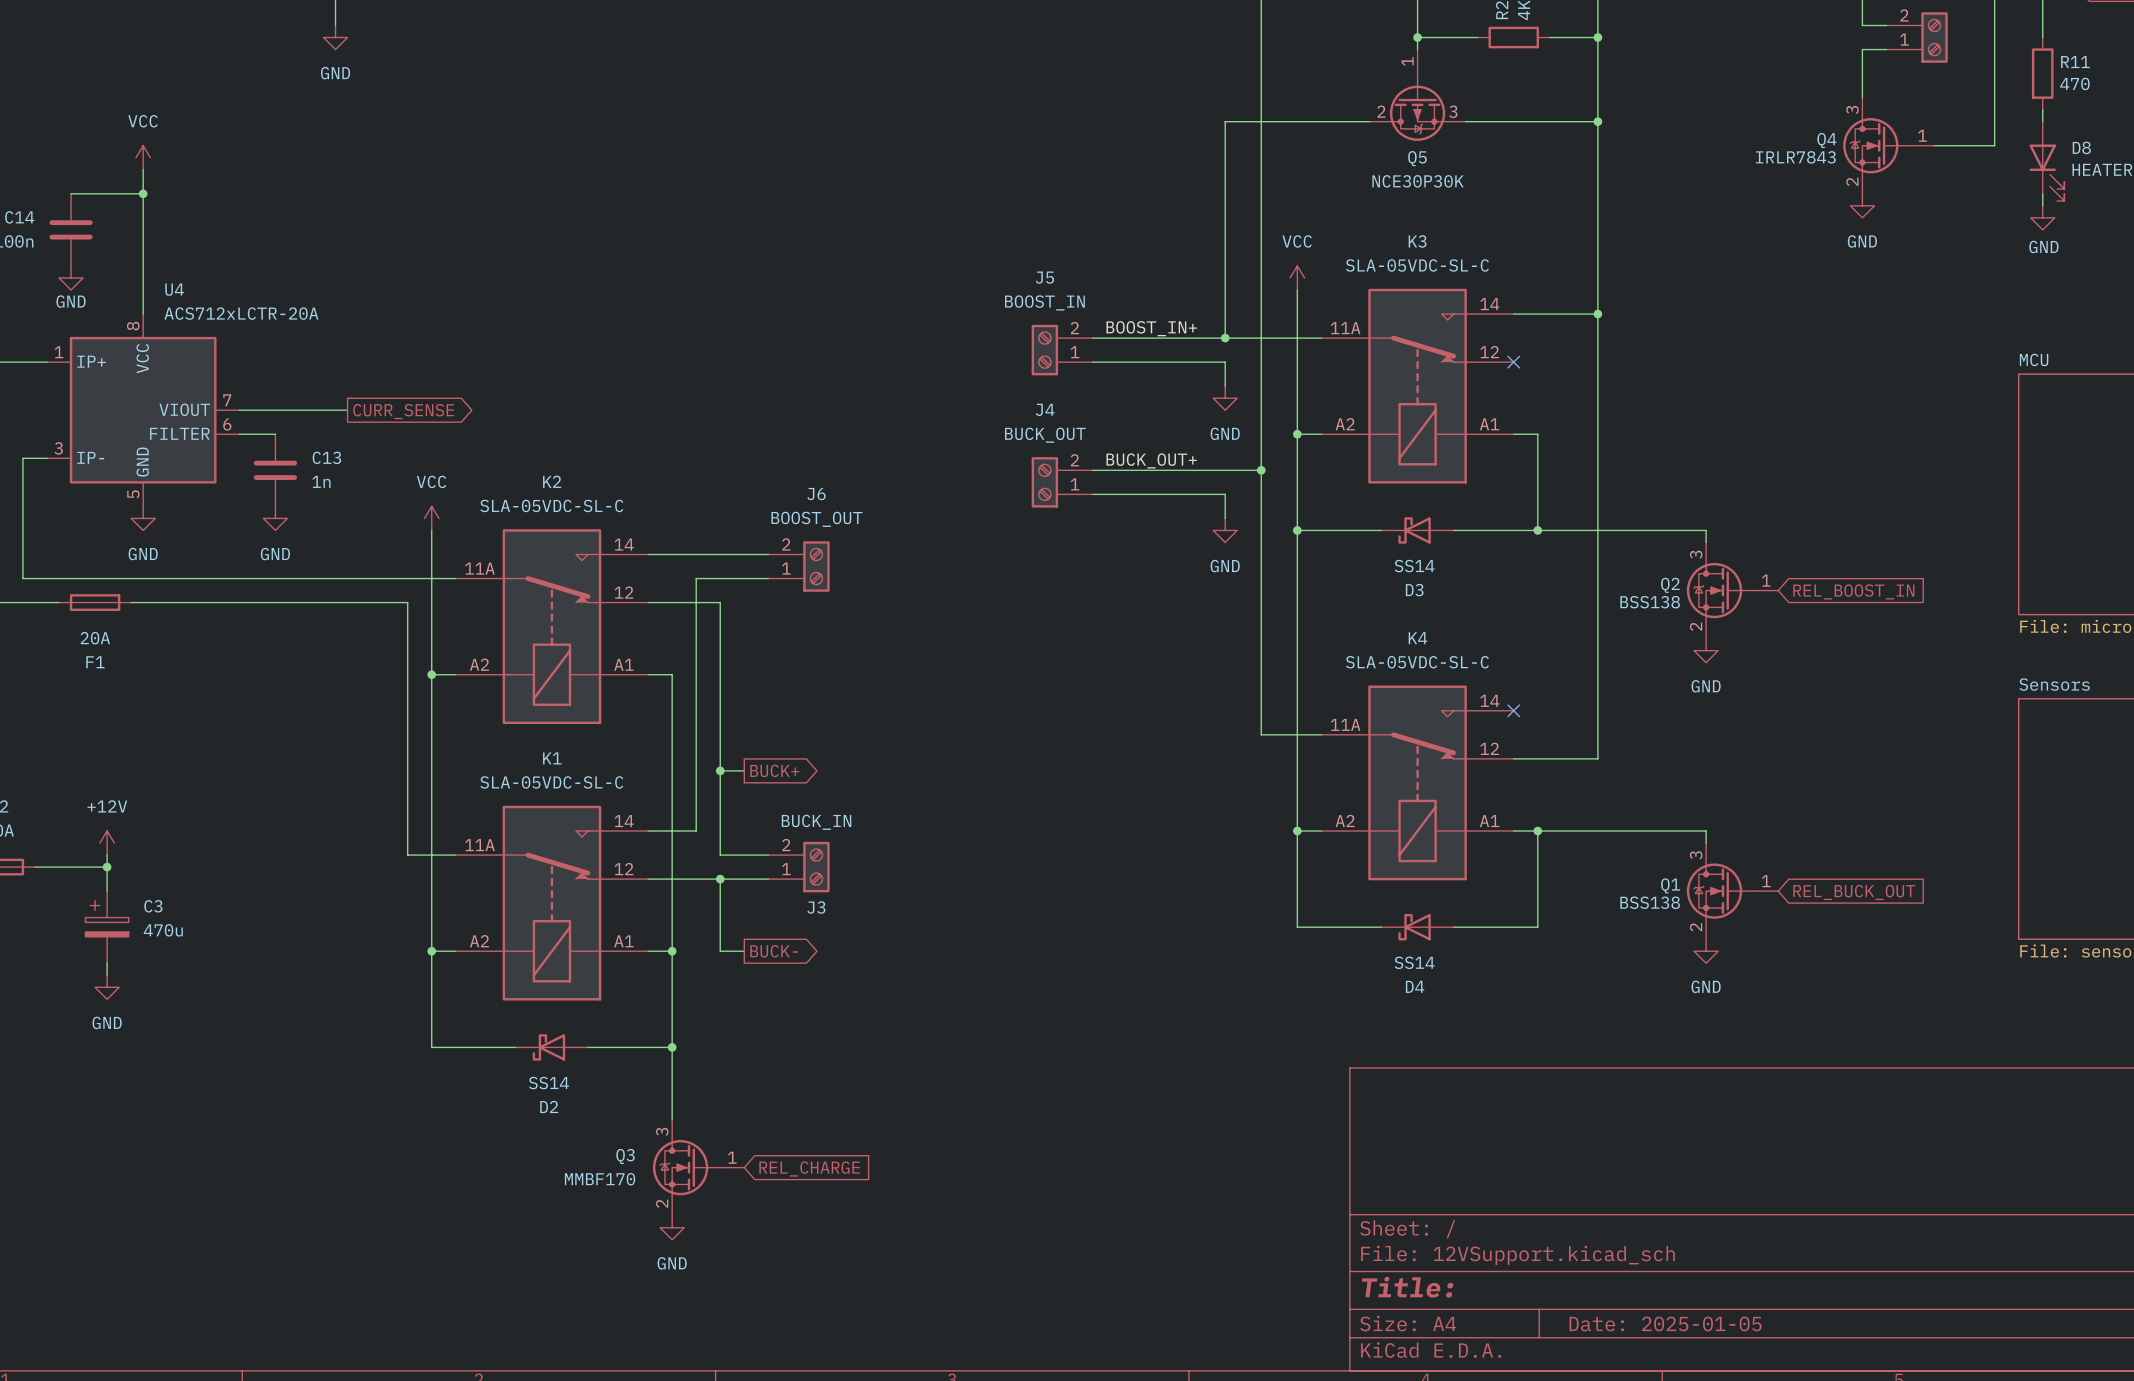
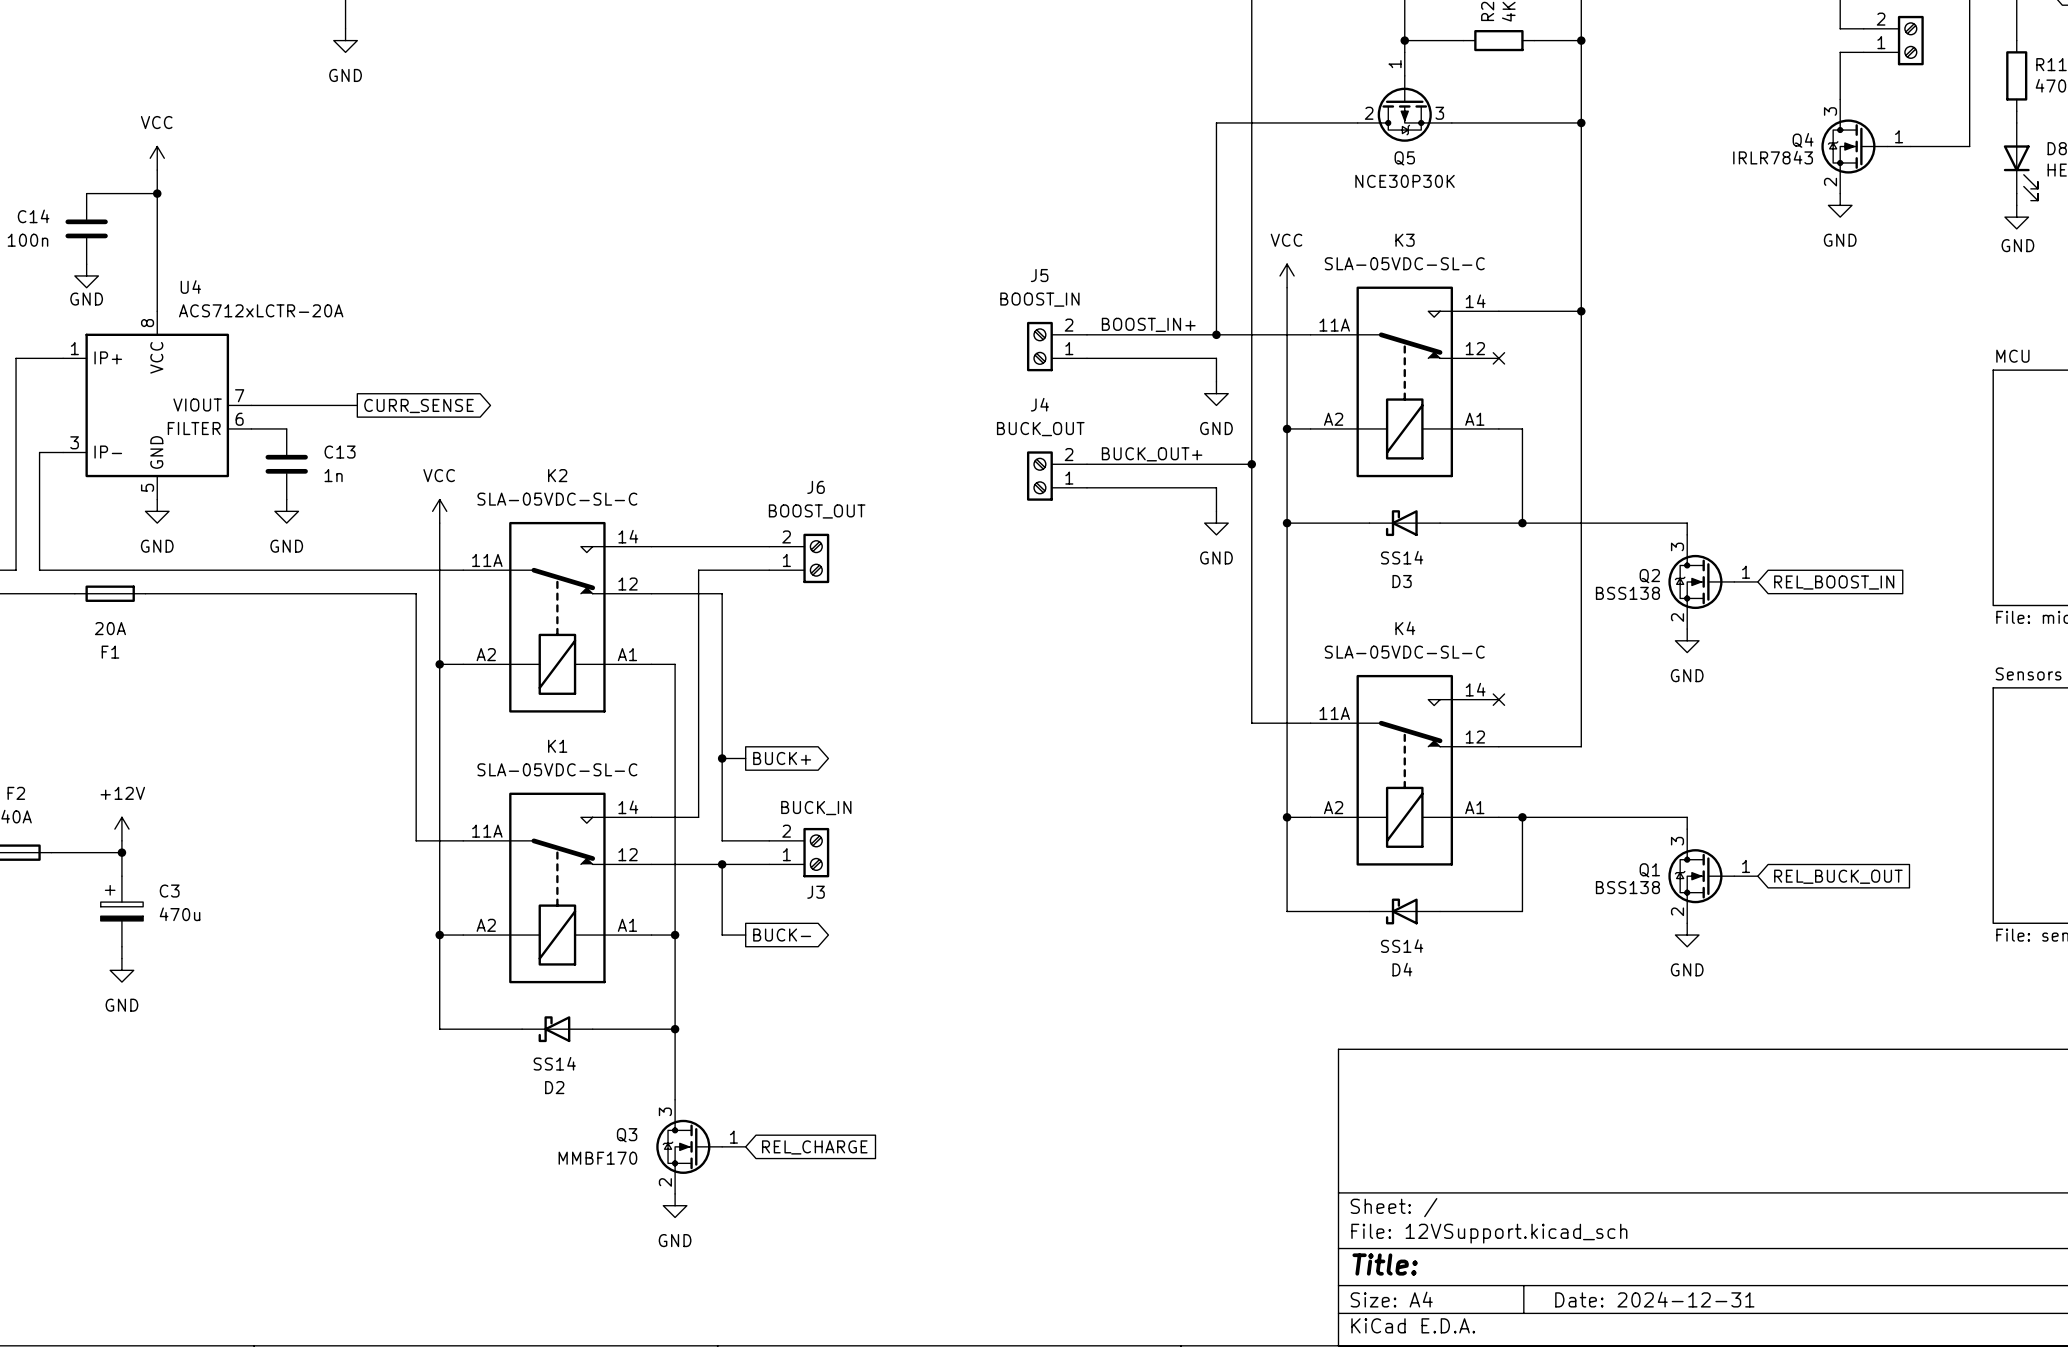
title block: Date: 2025-01-05 (1665, 1323) -> Date: 2024-12-31 (1654, 1299)

